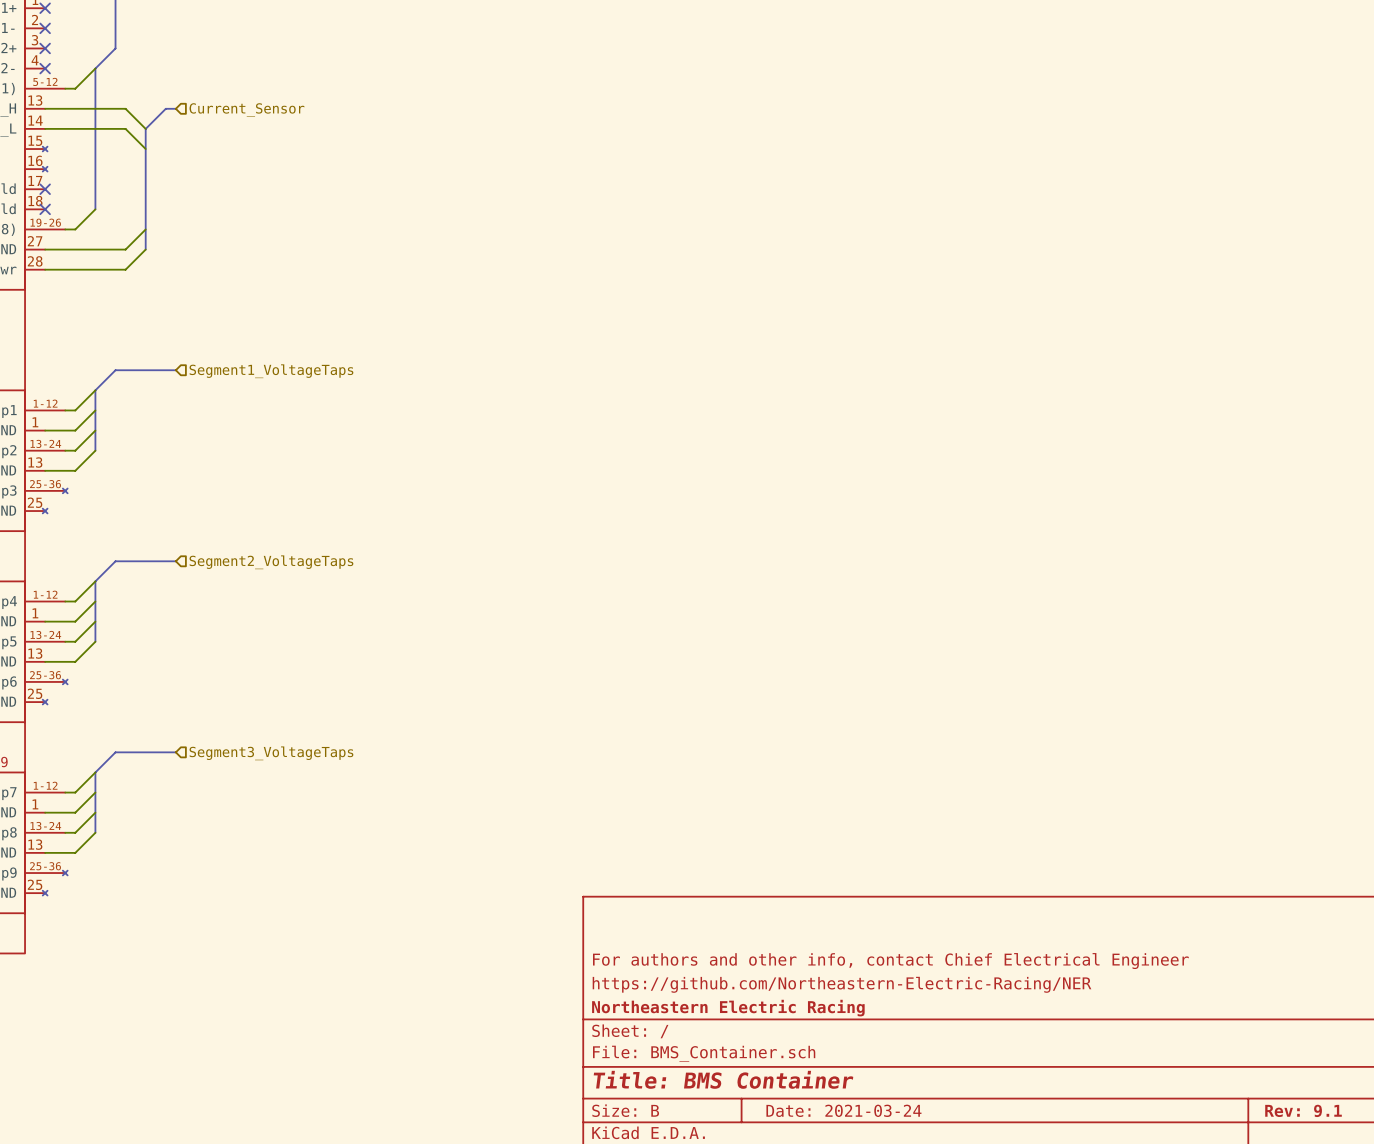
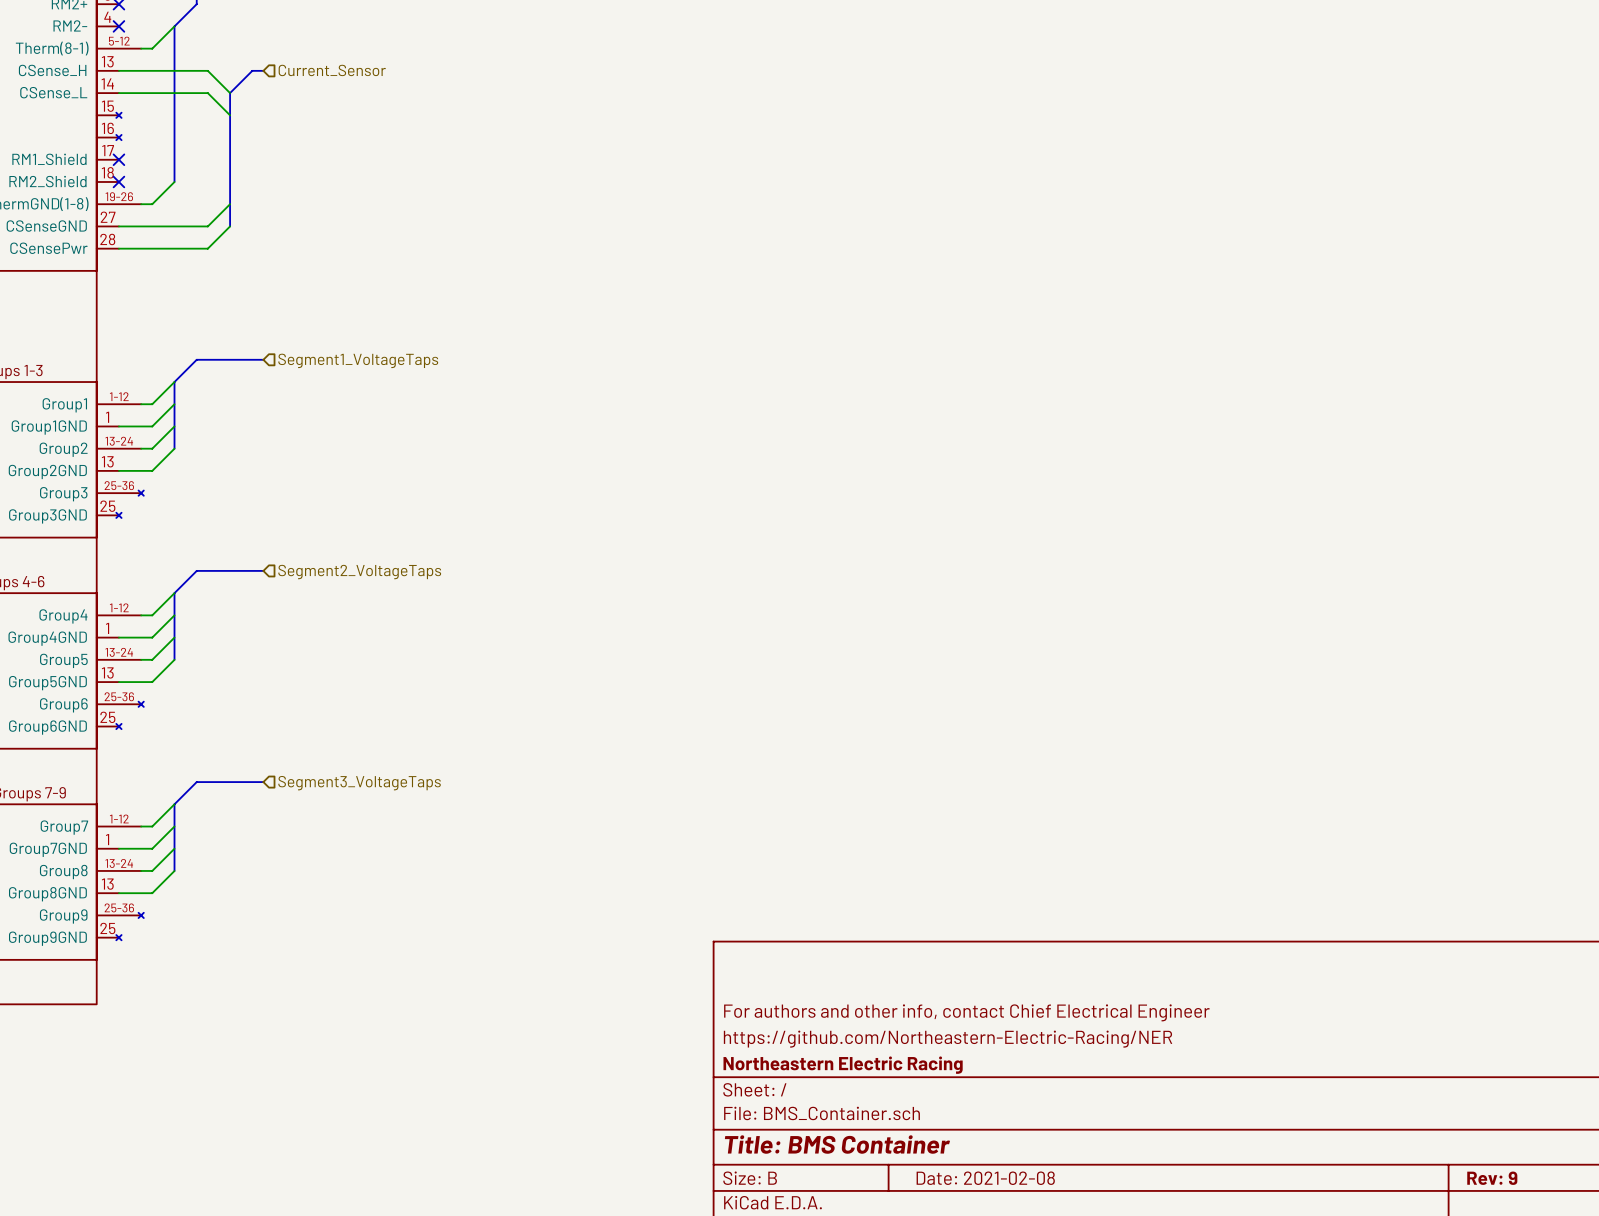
title block: Date: 2021-03-24 (843, 1110) -> Date: 2021-02-08 (985, 1178)
title block: Rev: 9.1 (1303, 1110) -> Rev: 9 (1492, 1178)

